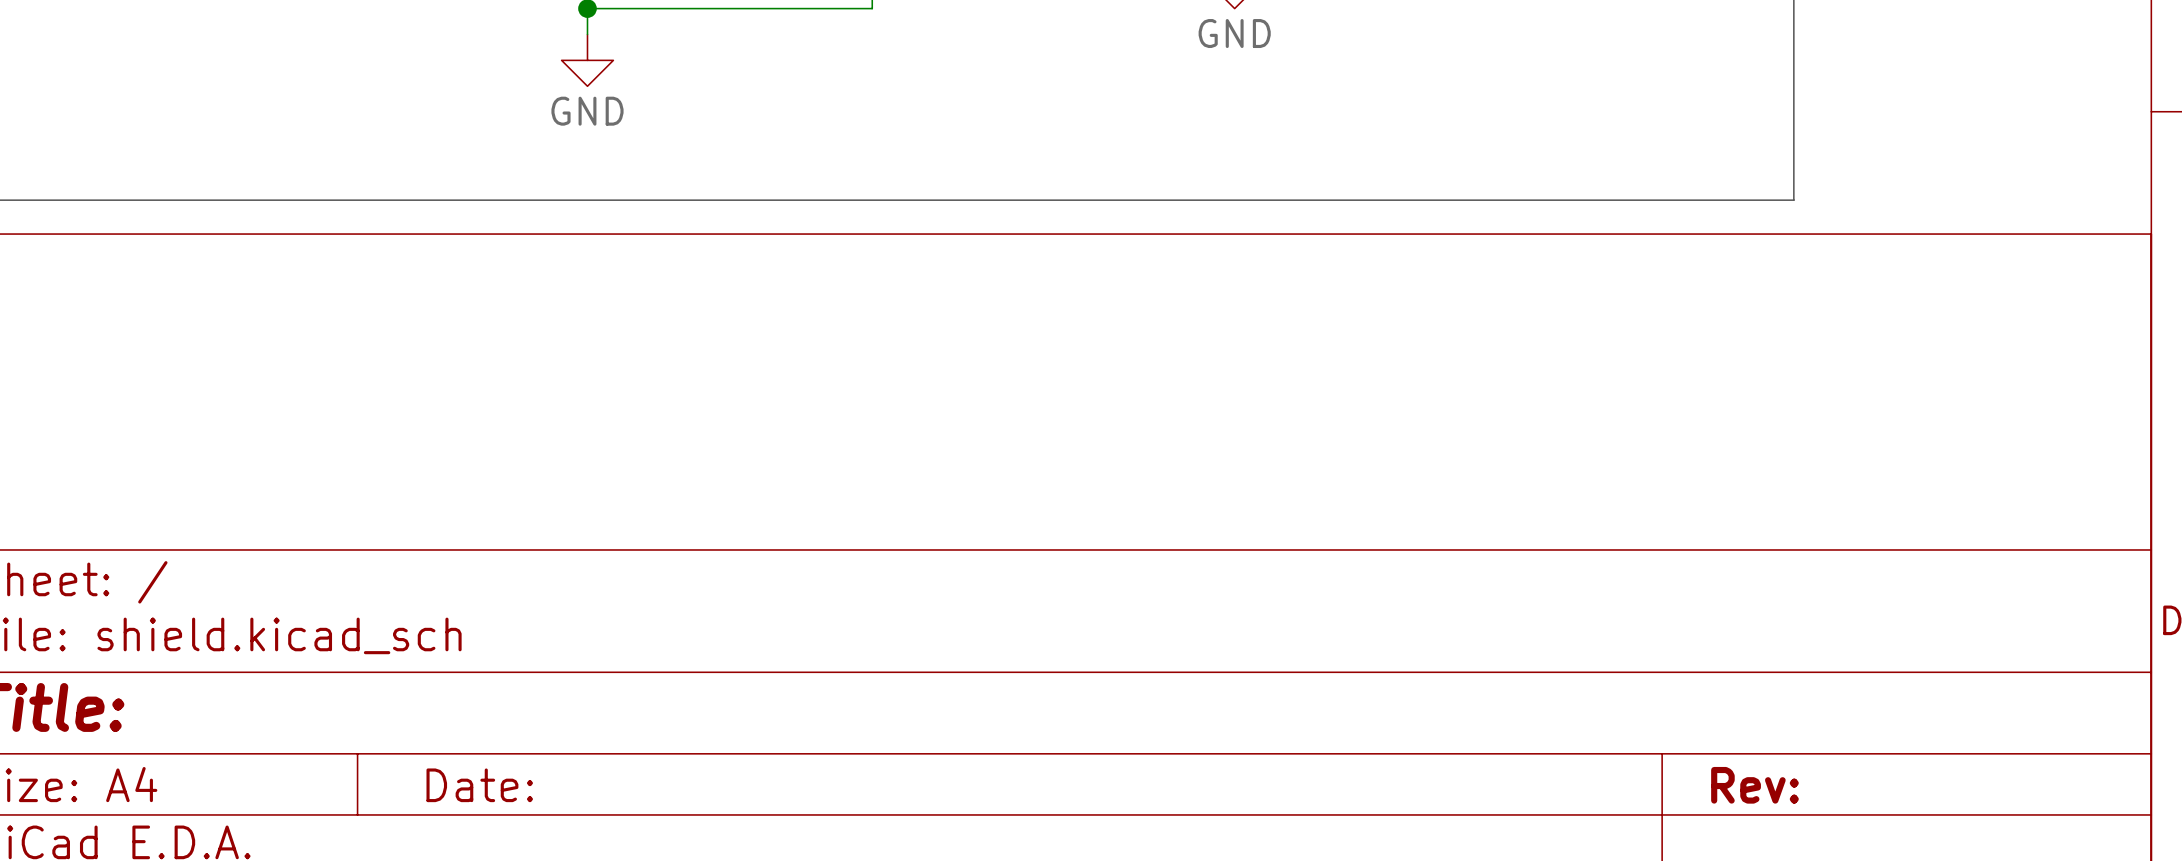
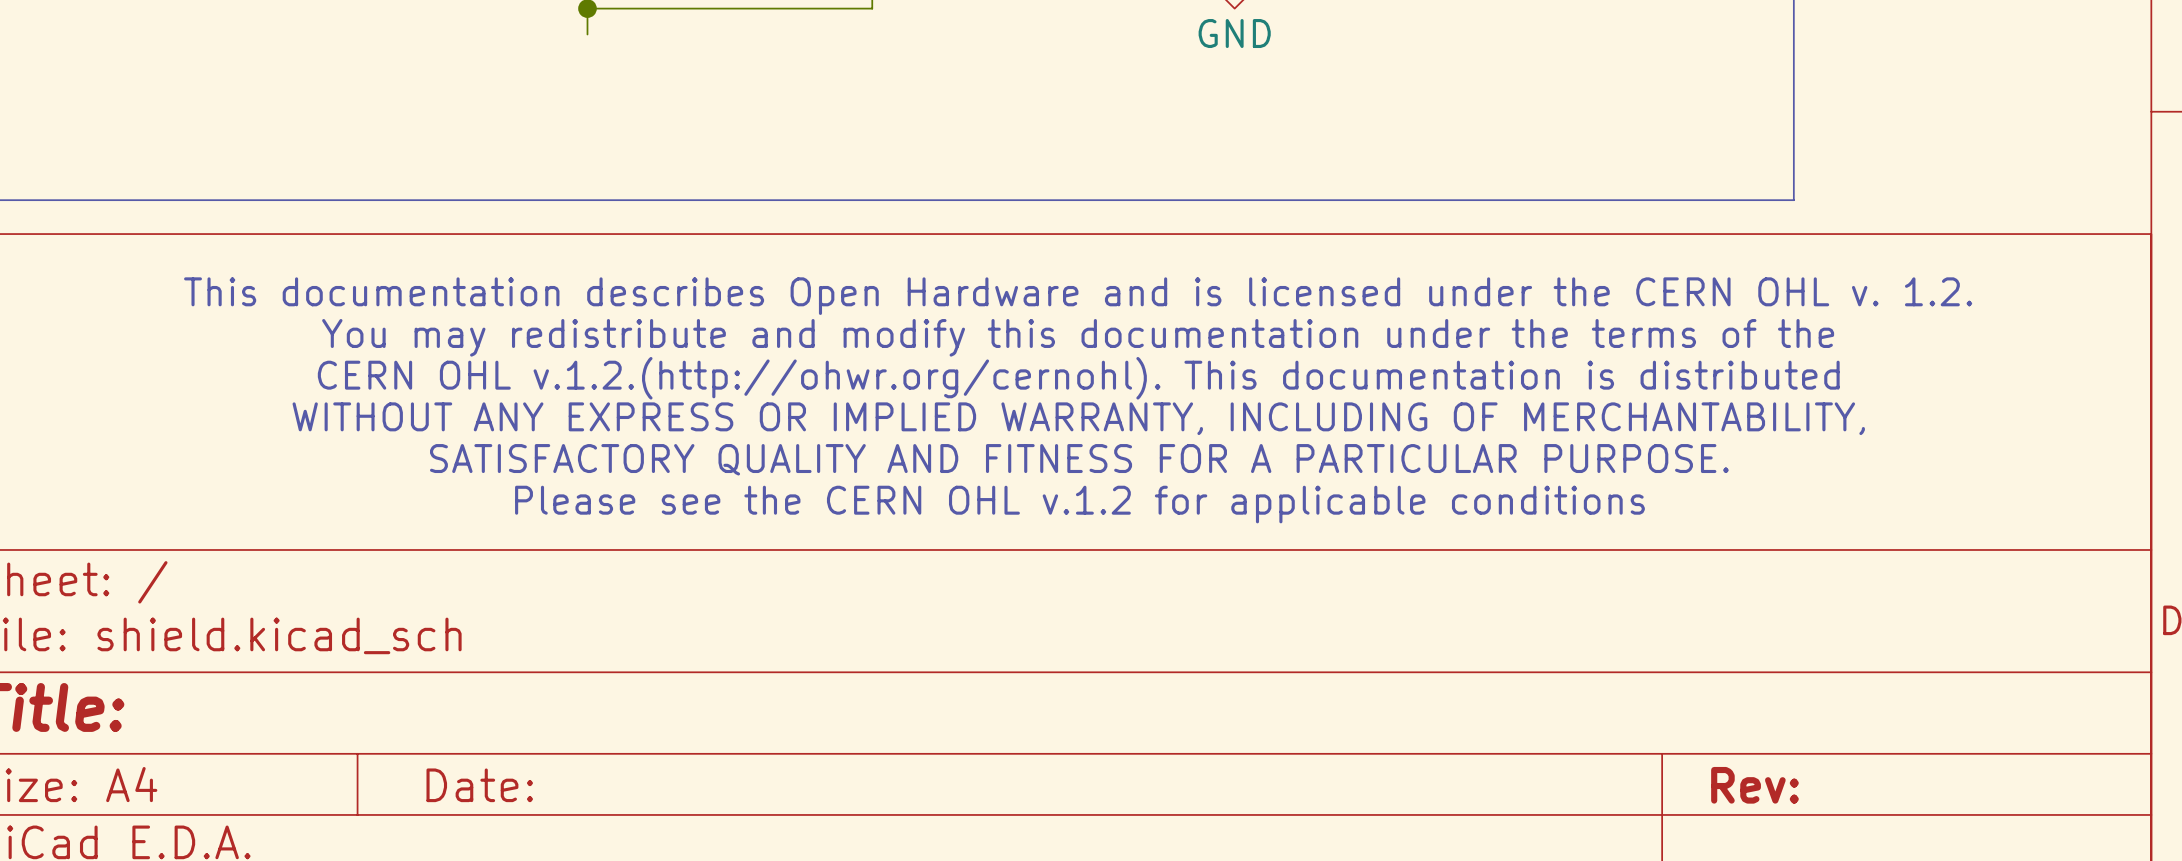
power symbol: GND (587, 60) -> none
text: none -> This documentation describes Open Hardware and is licensed under the CERN OHL v. 1.2. (1078, 296)
text: none -> You may redistribute and modify this documentation under the terms of the (1078, 337)
text: none -> CERN OHL v.1.2.(http://ohwr.org/cernohl). This documentation is distributed (1078, 378)
text: none -> WITHOUT ANY EXPRESS OR IMPLIED WARRANTY, INCLUDING OF MERCHANTABILITY, (1078, 418)
text: none -> SATISFACTORY QUALITY AND FITNESS FOR A PARTICULAR PURPOSE. (1079, 459)
text: none -> Please see the CERN OHL v.1.2 for applicable conditions (1079, 504)

